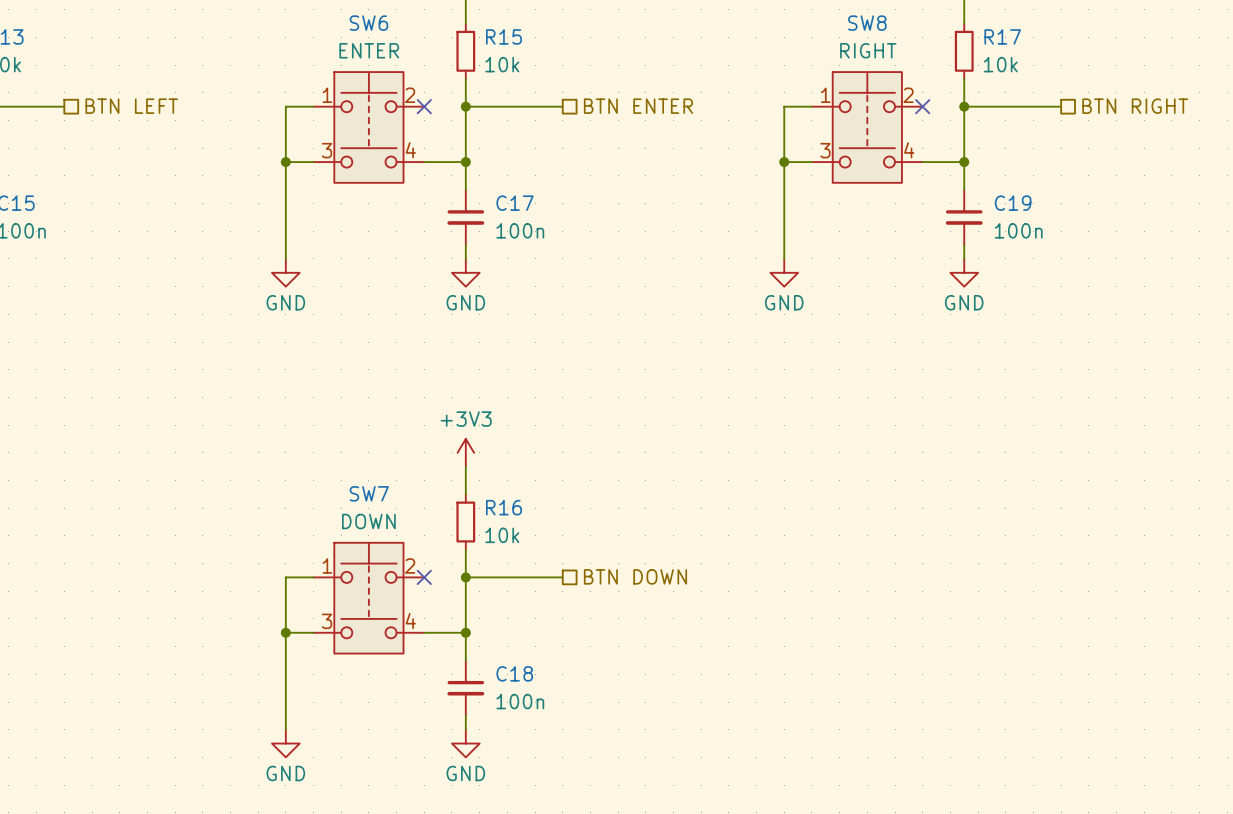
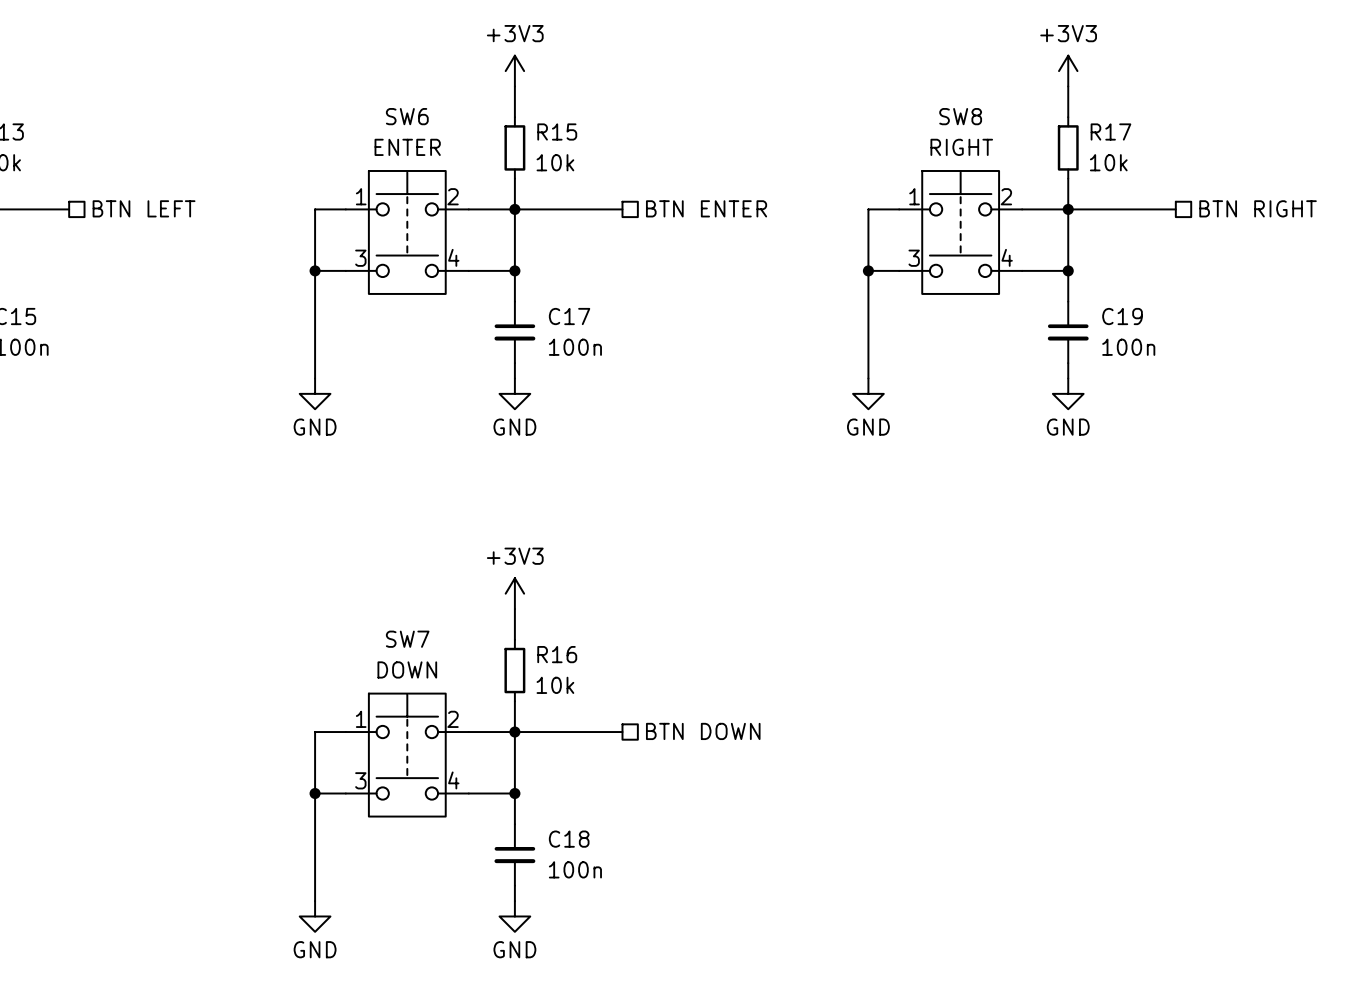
wire: none -> (468, 209) (514, 209)
no-connect mark: (424, 106) -> none
wire: none -> (1022, 209) (1068, 209)
no-connect mark: (922, 106) -> none
wire: none -> (468, 732) (514, 732)
no-connect mark: (424, 577) -> none

